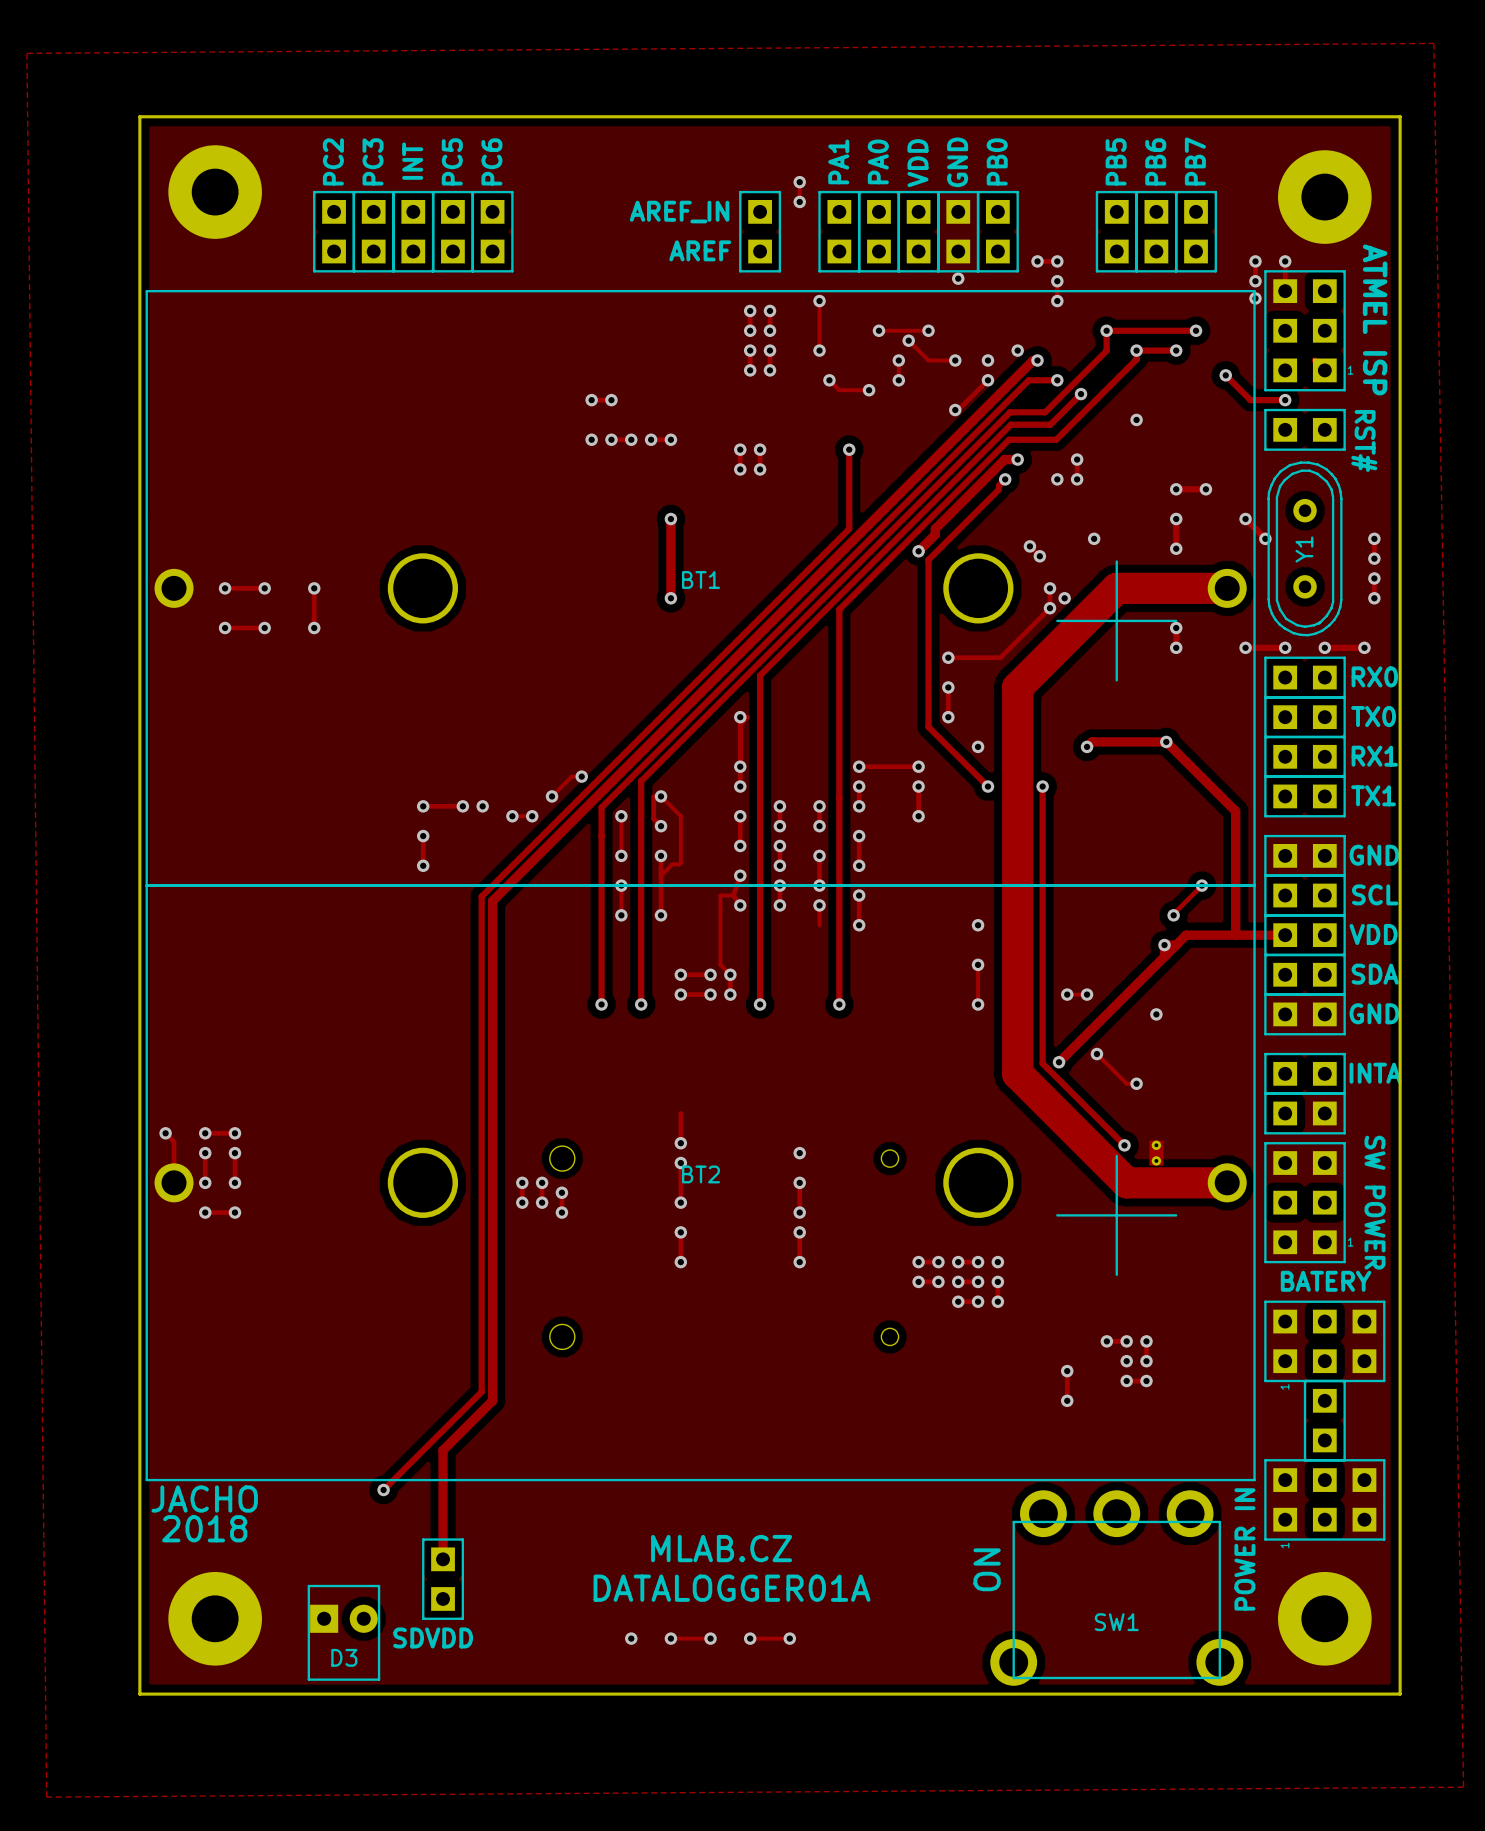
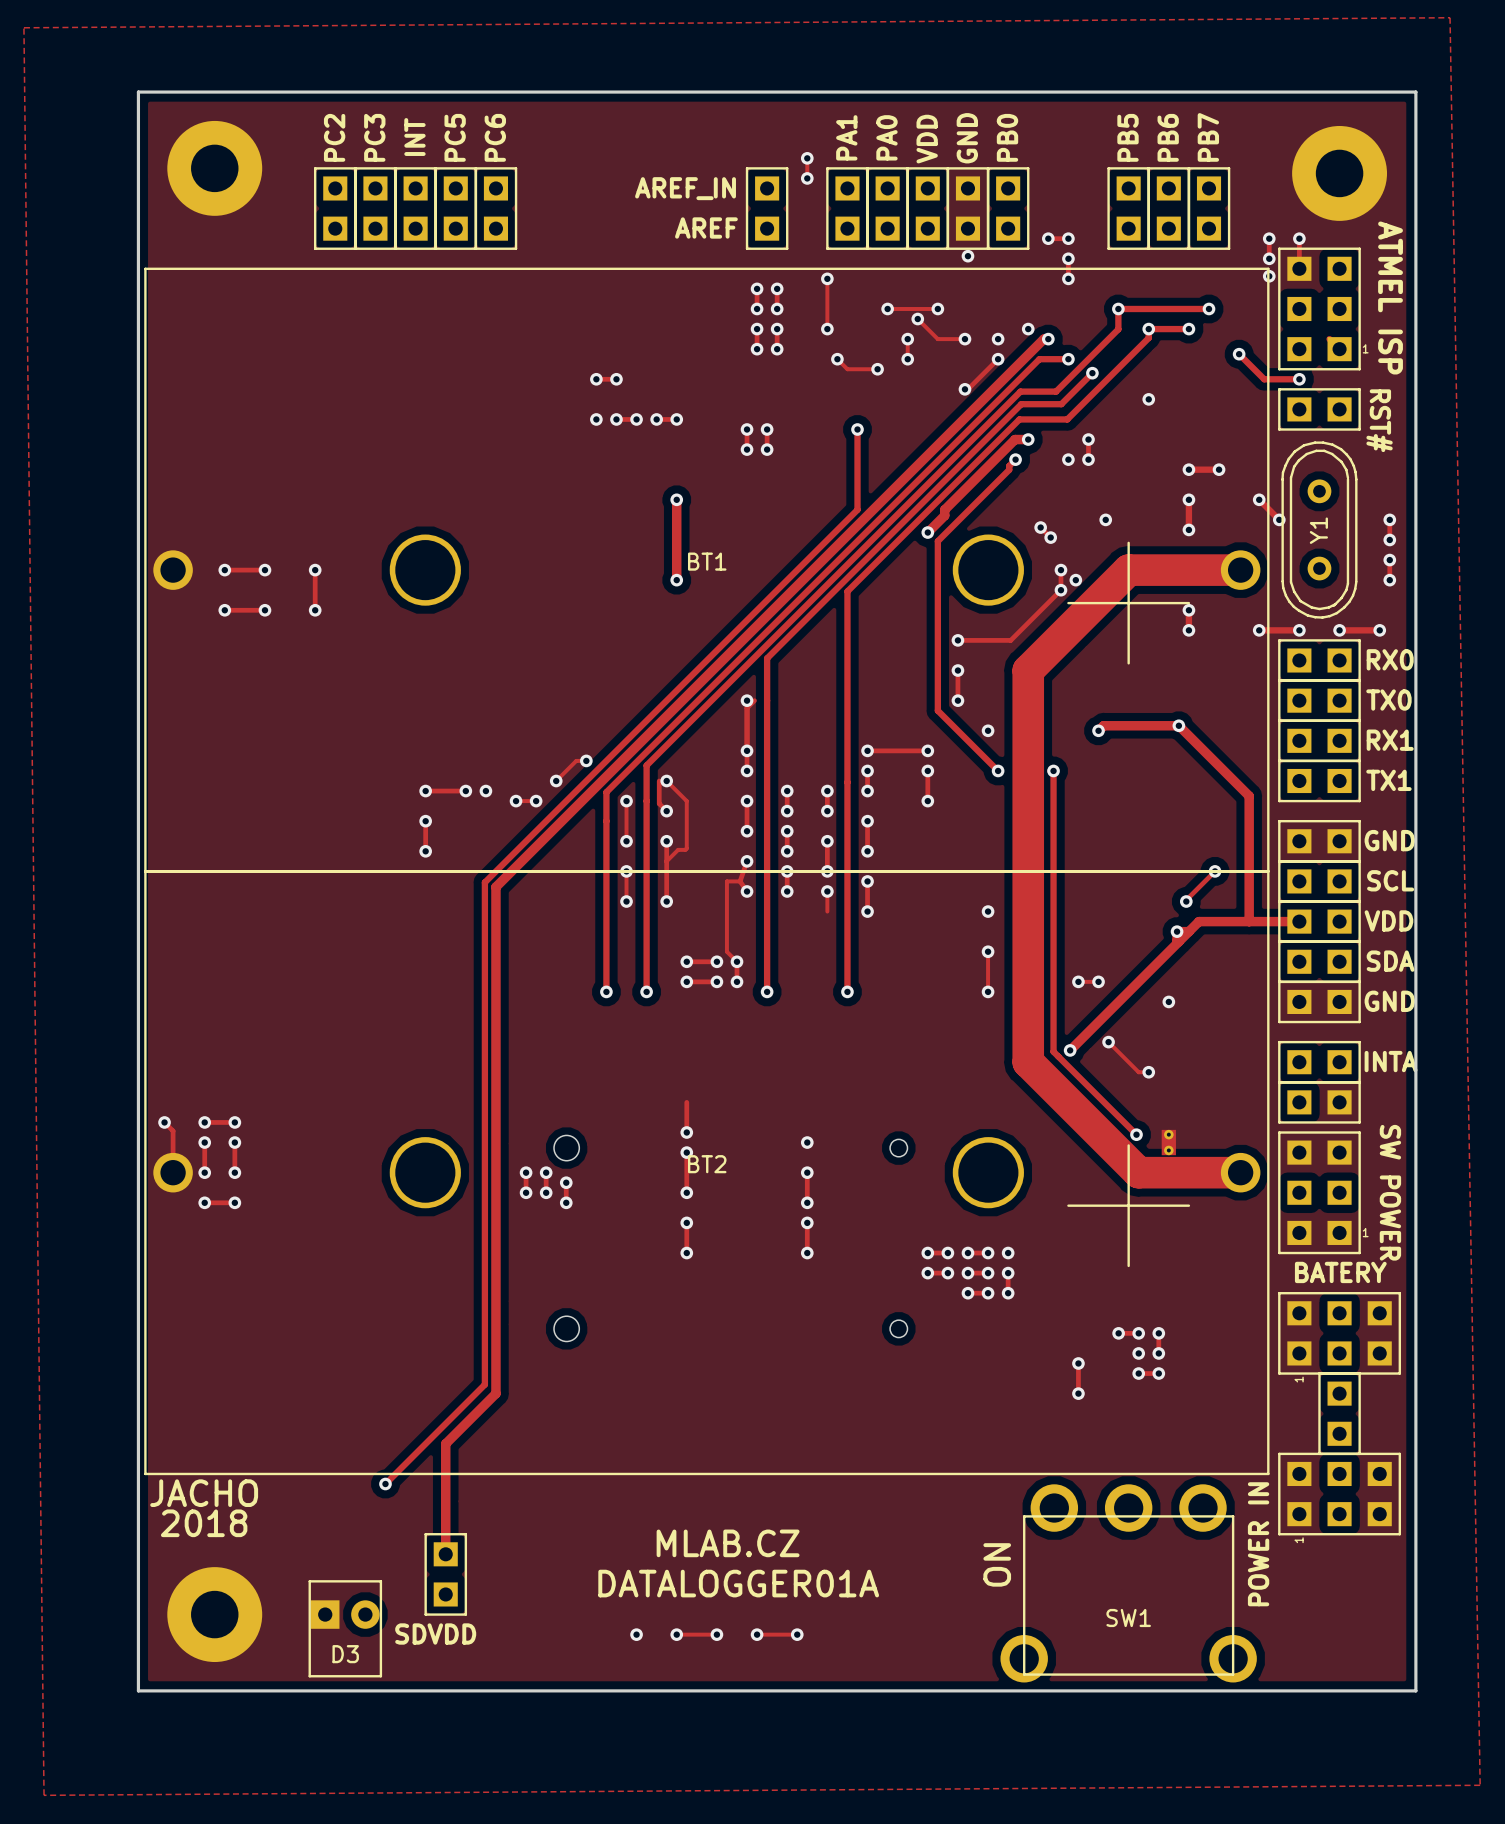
part: (1324, 1618) -> none

